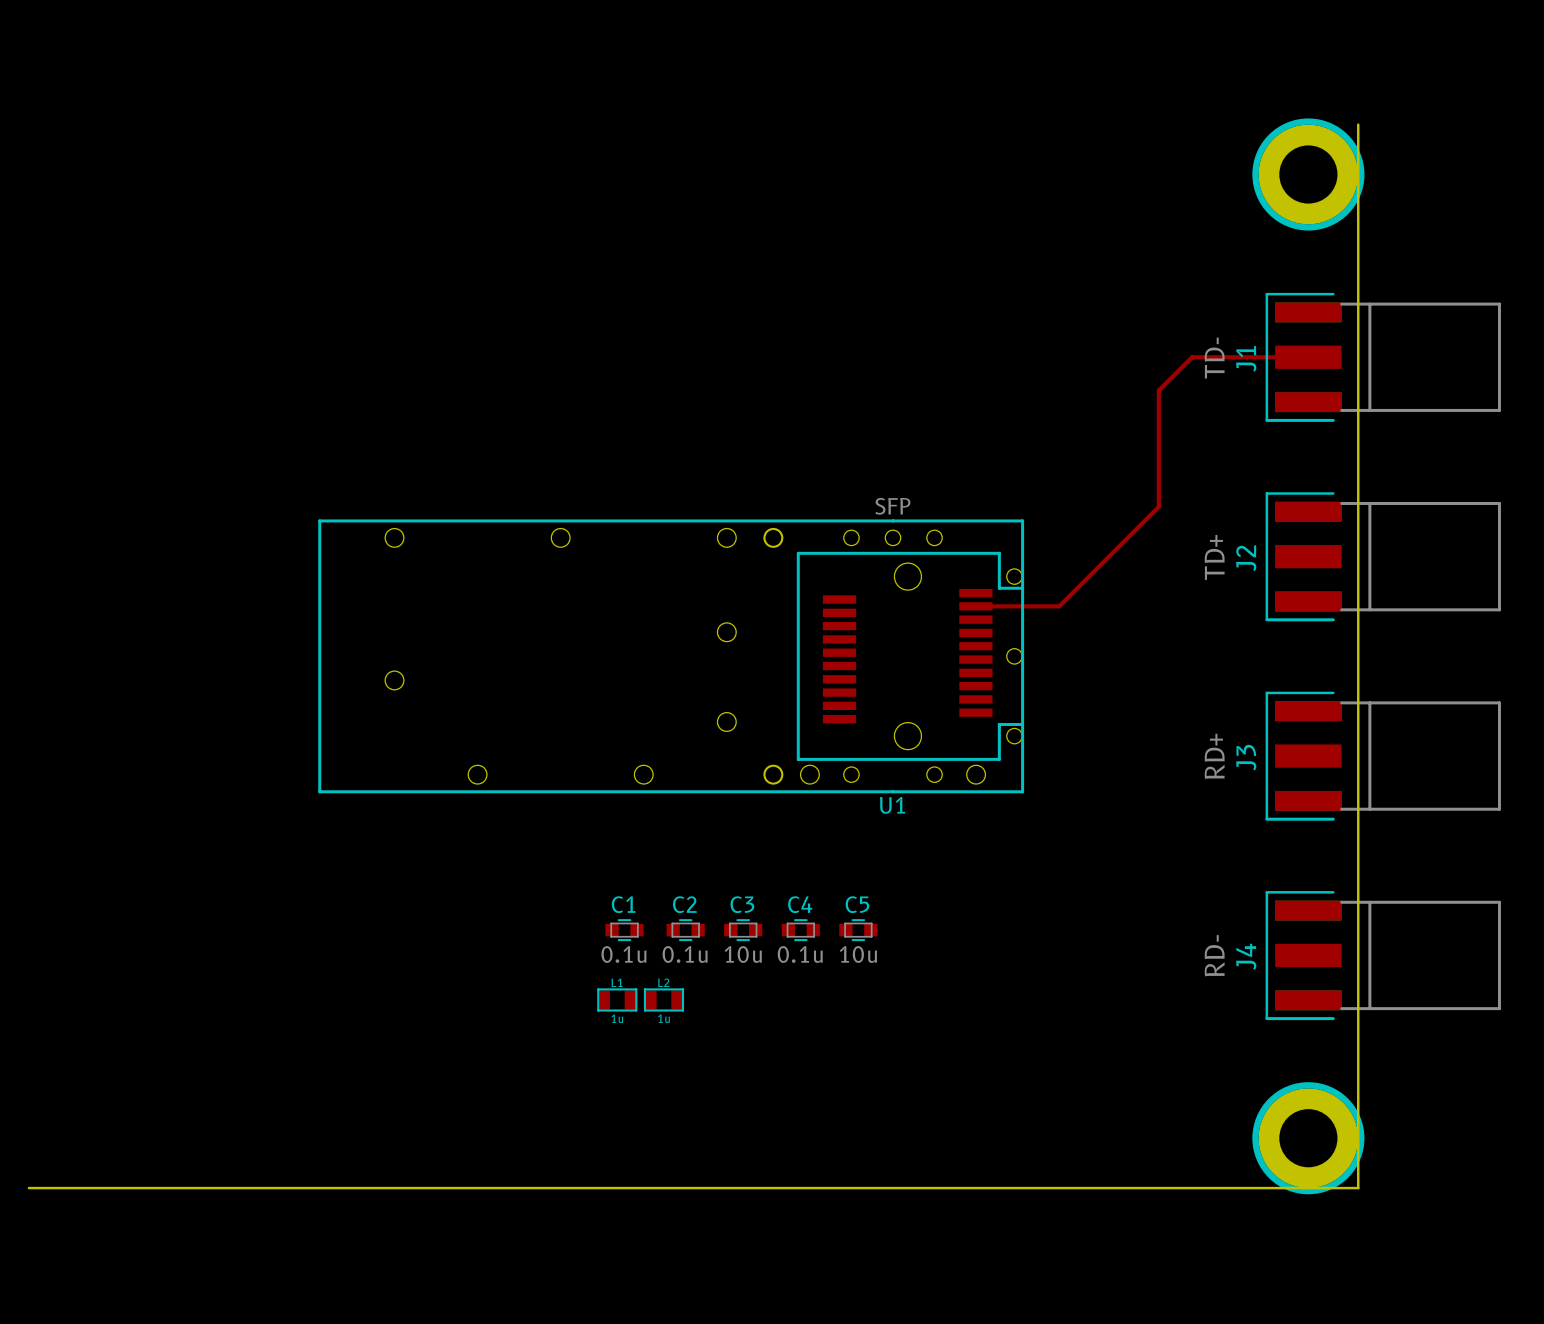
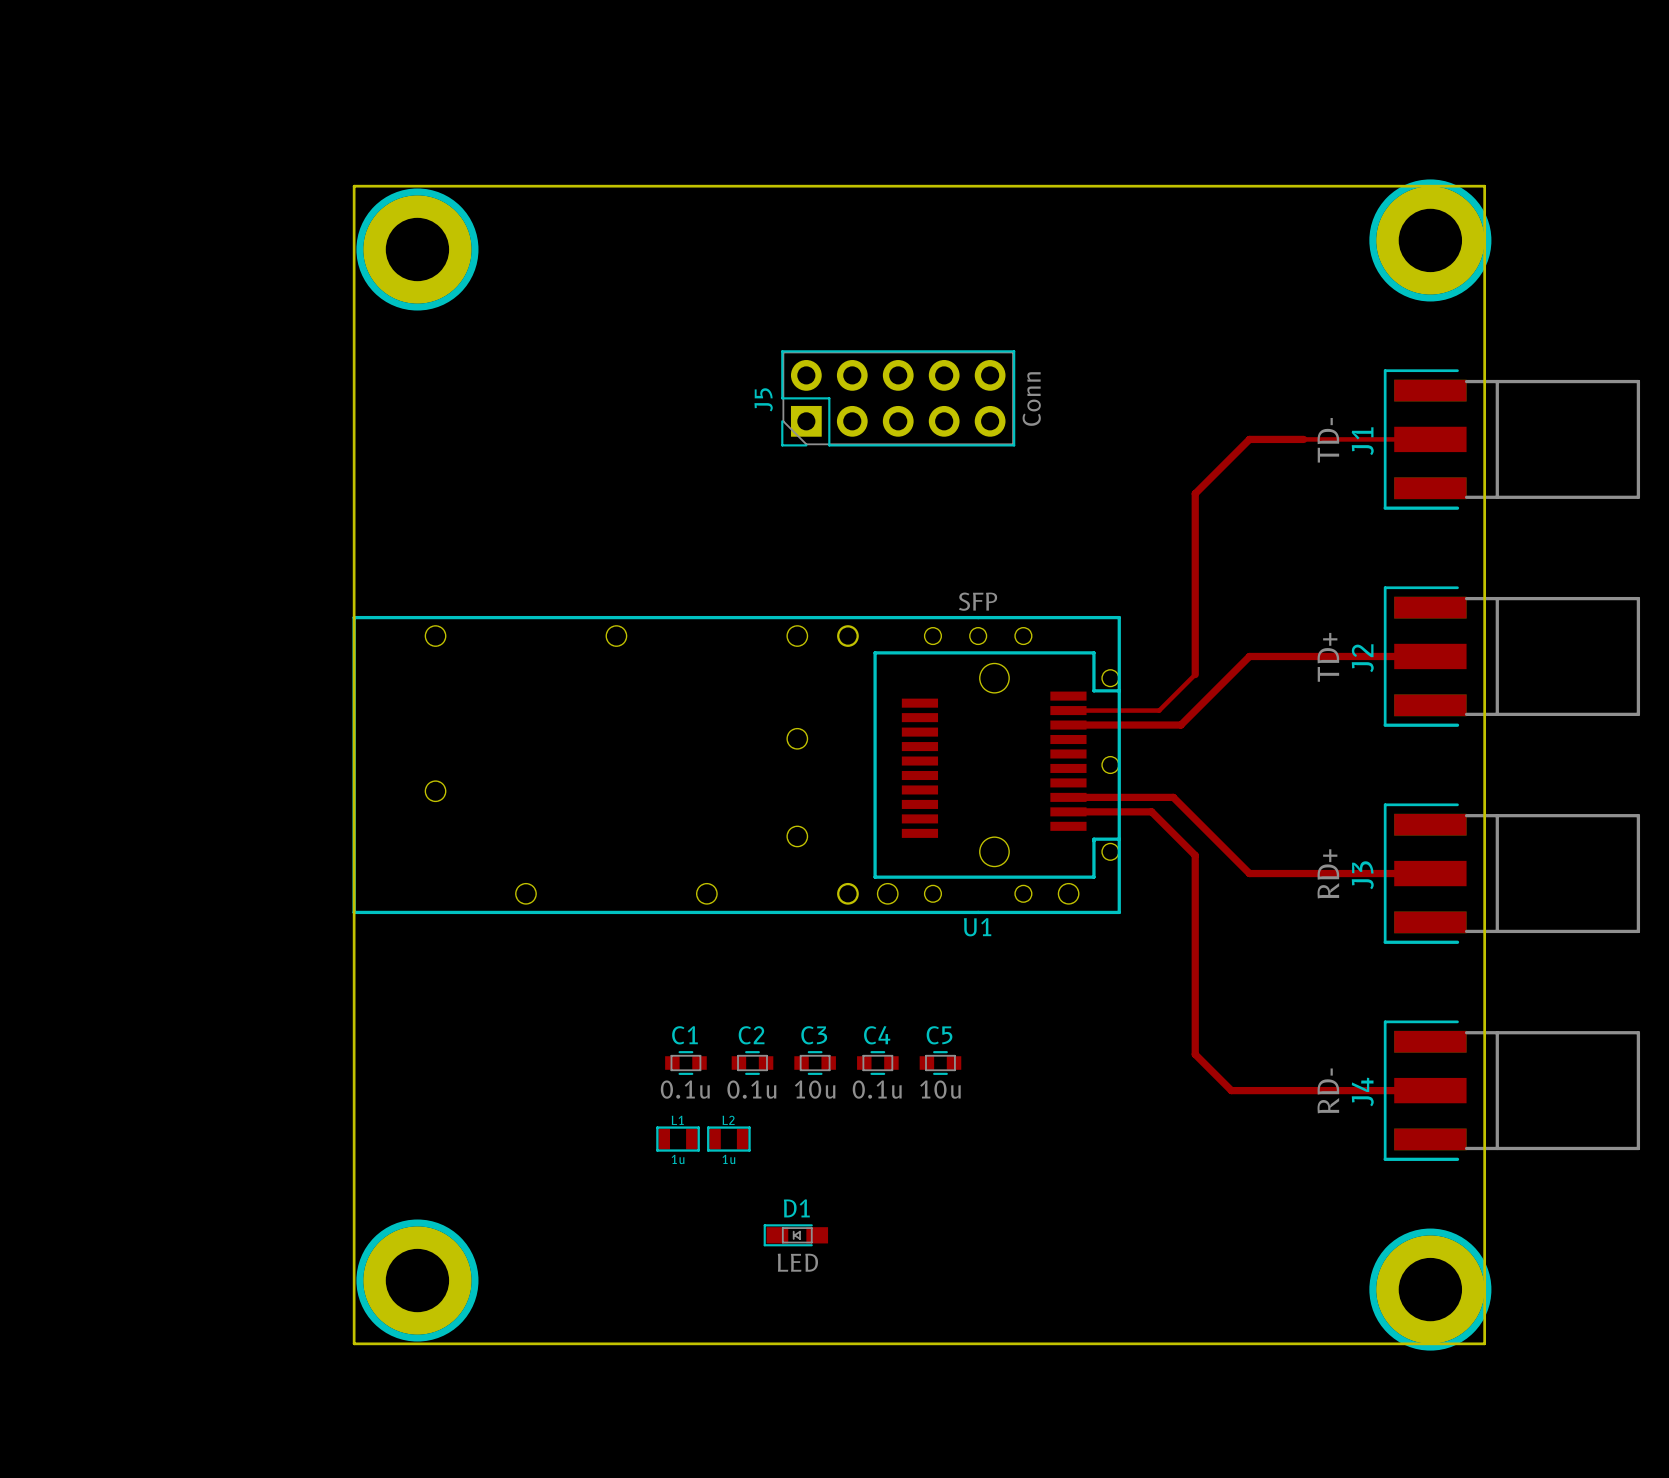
part: none -> (417, 249)
J5: none -> Conn (898, 398)
top track: (1192, 357) (1158, 390) (1158, 506) (1092, 573) -> (1303, 439) (1249, 439) (1195, 493) (1195, 674)
top track: none -> (1430, 656) (1249, 656) (1180, 725) (1068, 725)
top track: none -> (1068, 797) (1173, 797) (1249, 873) (1430, 873)
top track: none -> (1068, 811) (1151, 811) (1195, 855) (1195, 1054) (1231, 1090) (1430, 1090)
D1: none -> LED (795, 1235)
part: none -> (417, 1280)
board edge: (28, 1188) (319, 1188) -> (1484, 186) (354, 186) (354, 1343)

